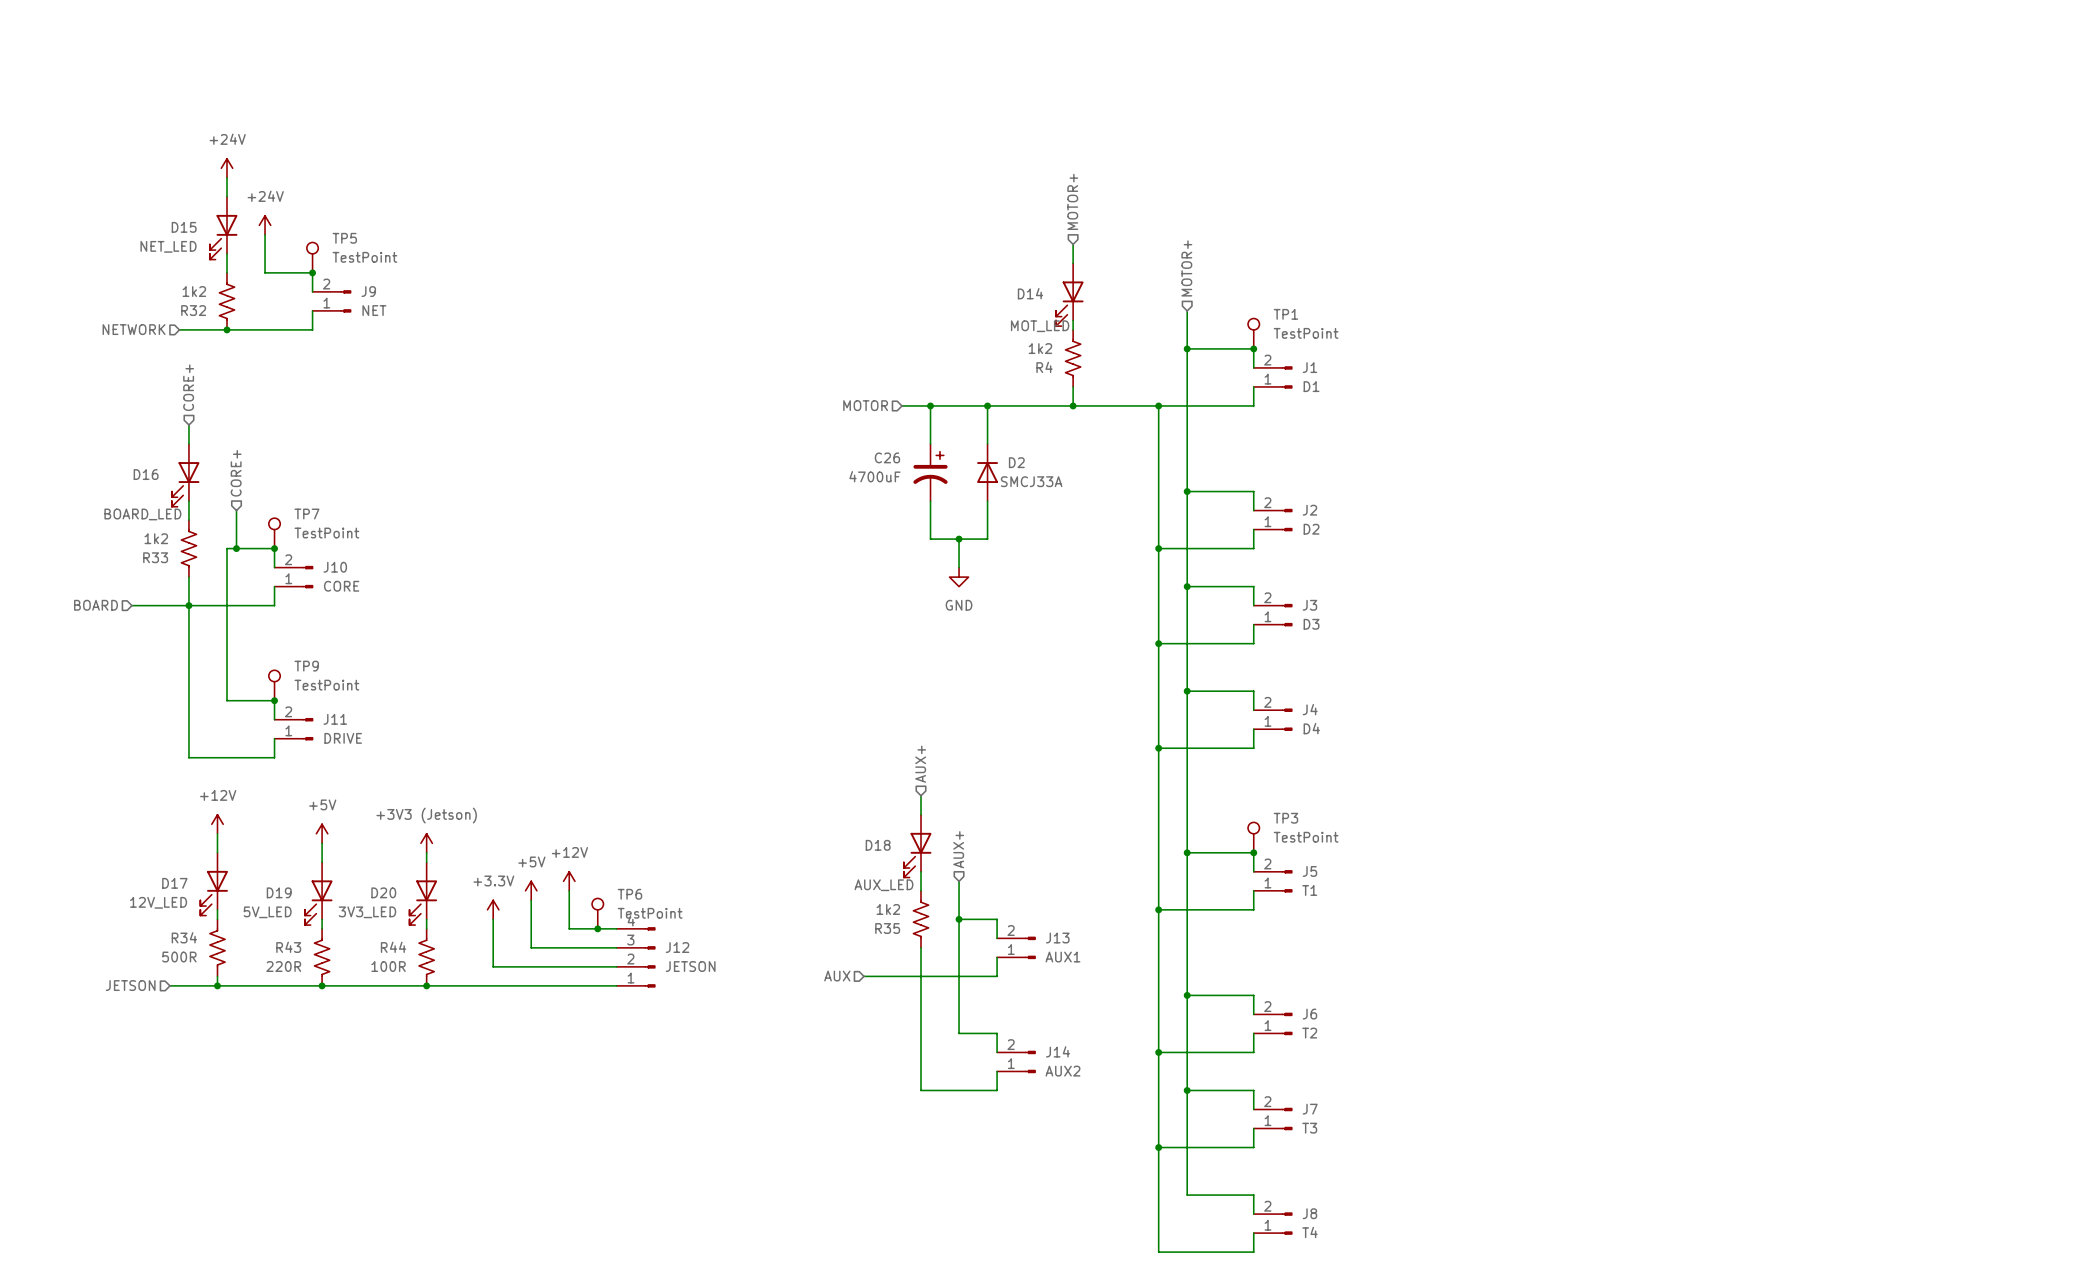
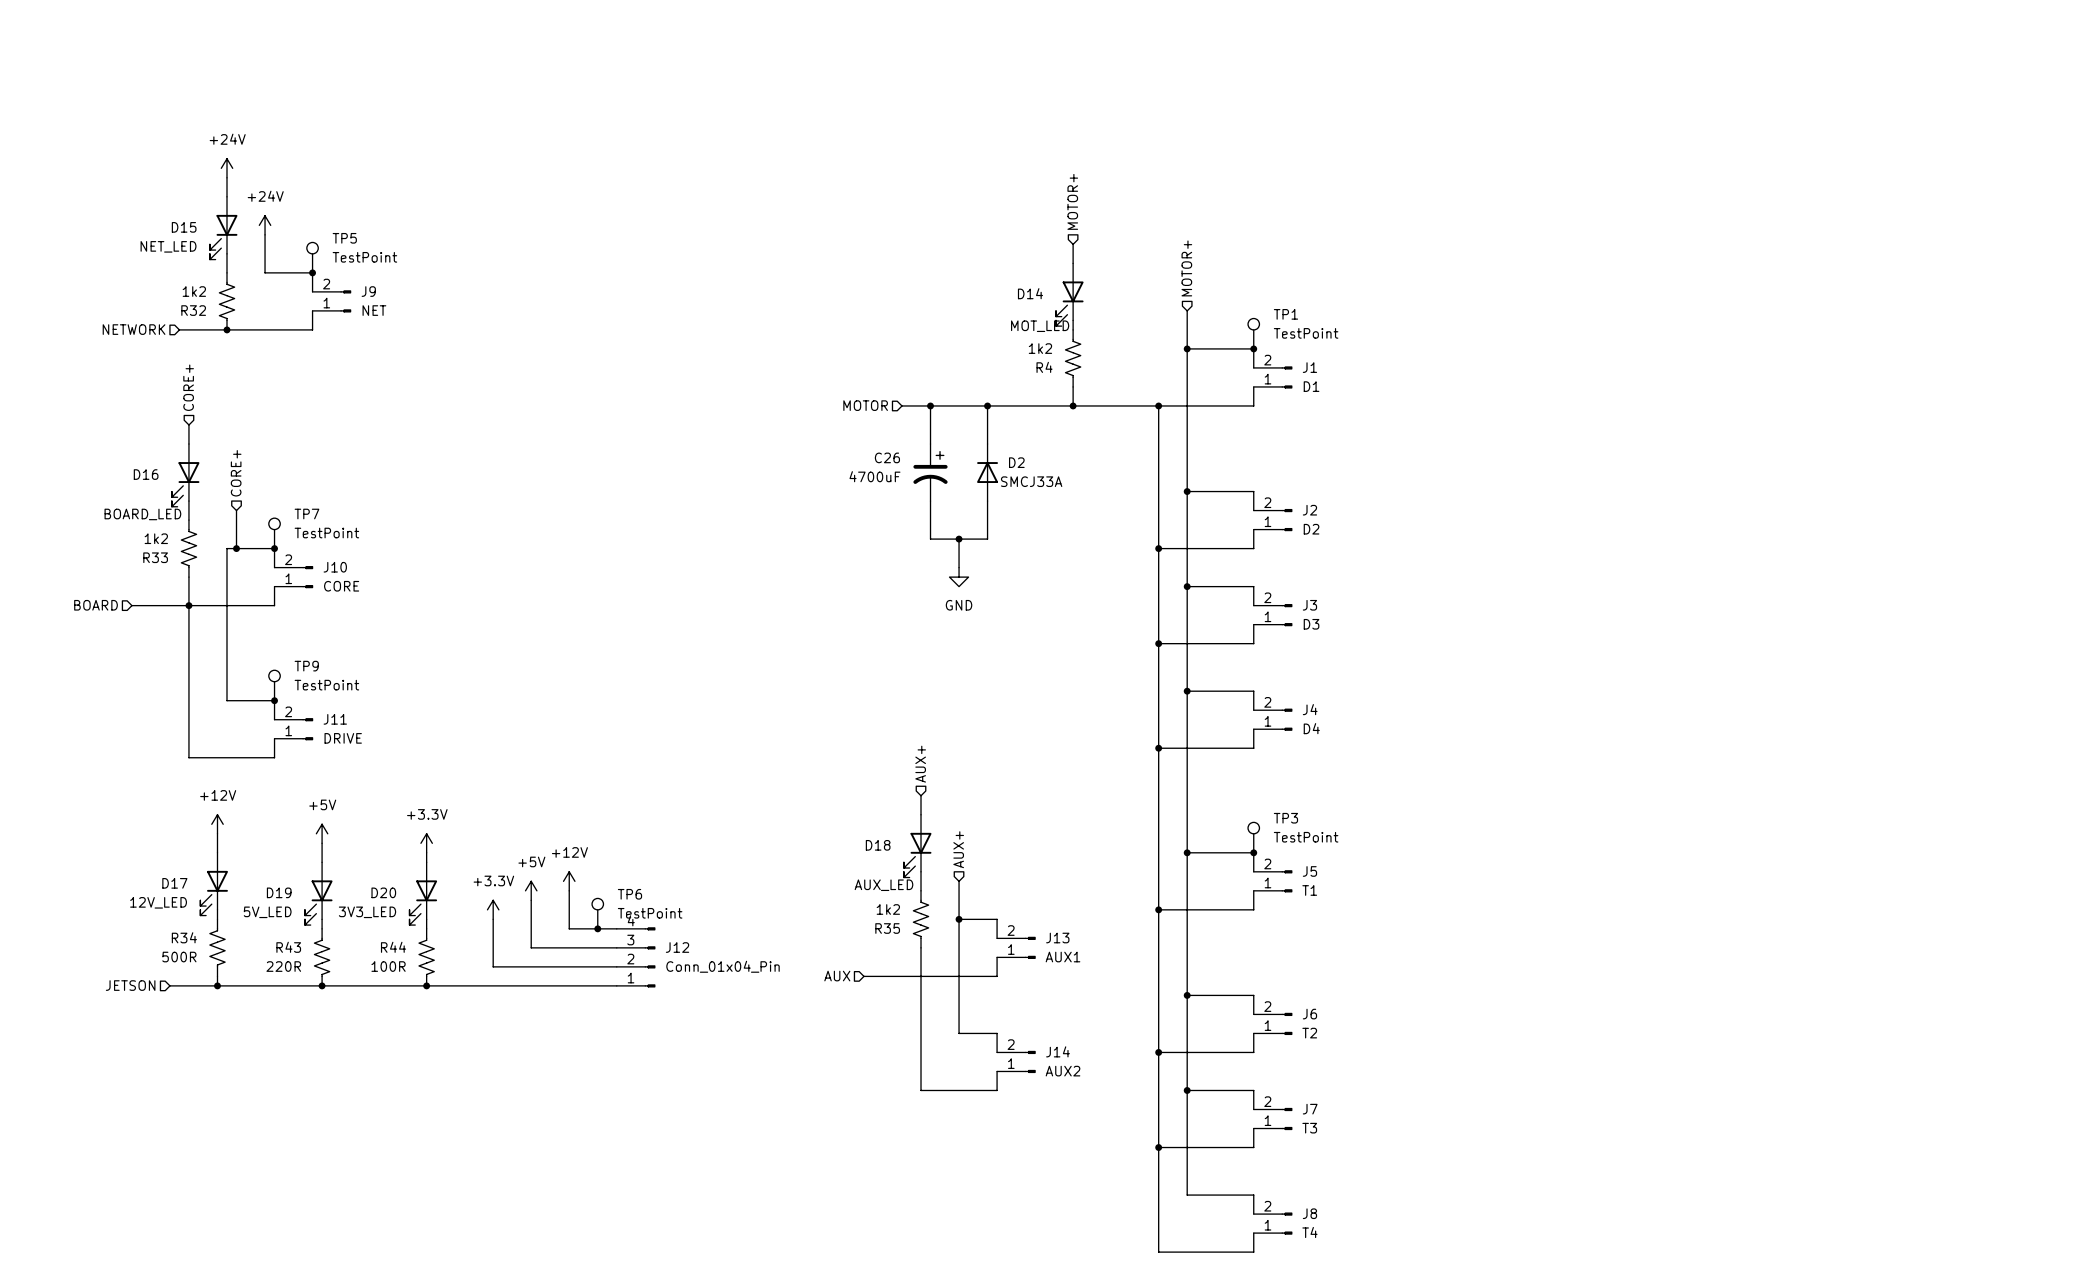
power symbol: +3V3 (Jetson) (426, 843) -> +3.3V (426, 843)
J12 value: JETSON (690, 966) -> Conn_01x04_Pin (723, 966)

